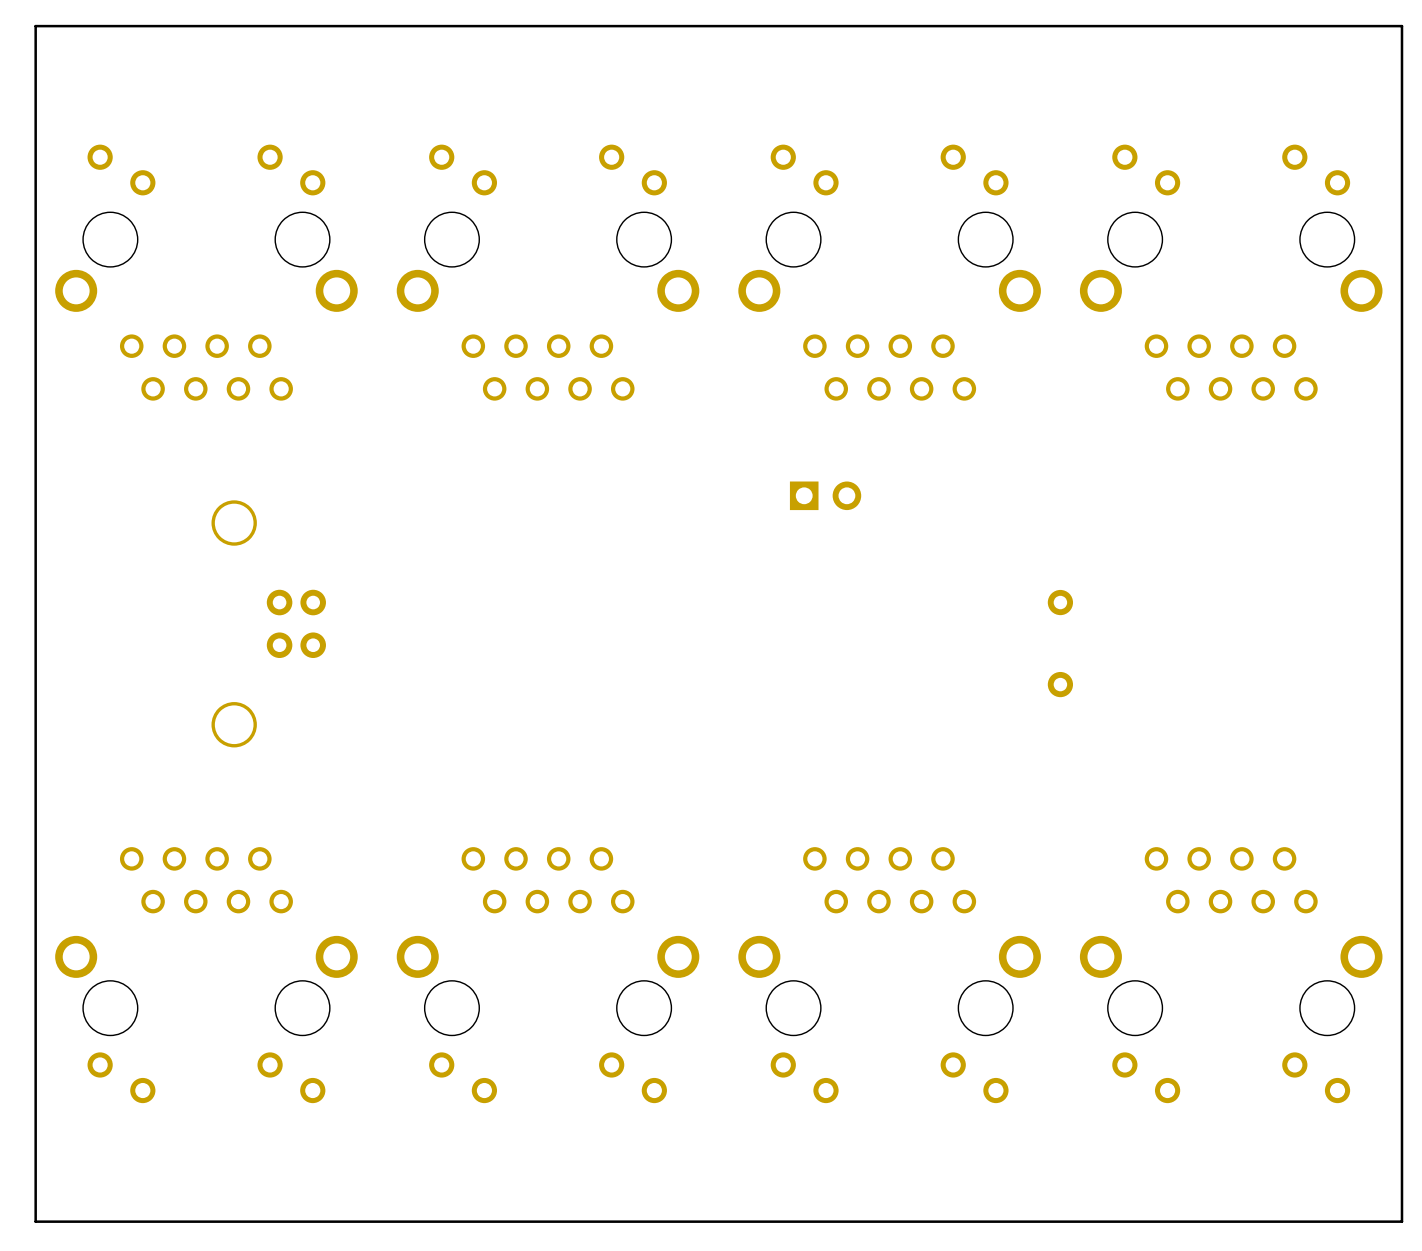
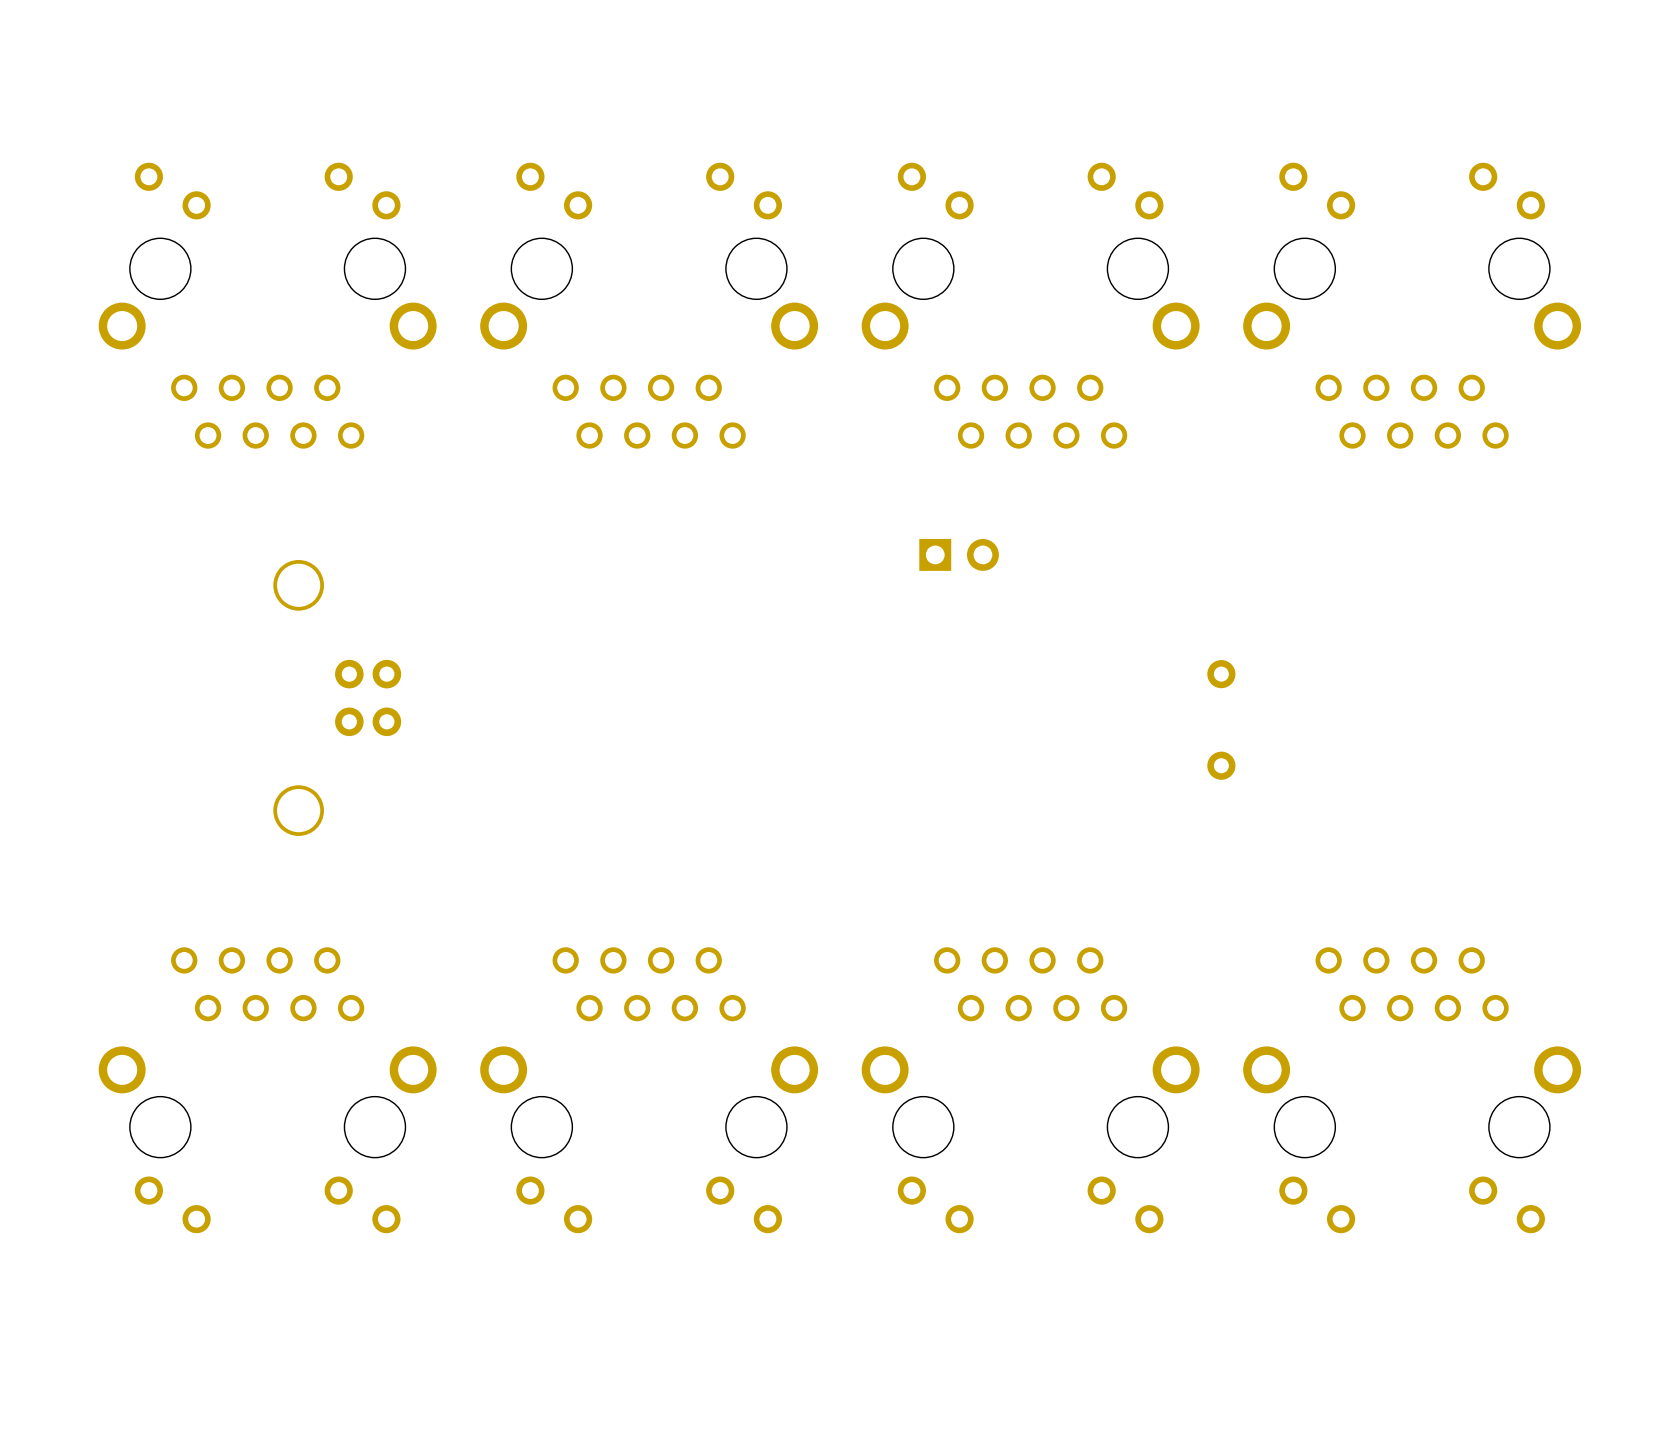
board edge: (1401, 26) (1401, 1221) (35, 1221) (35, 26) (1401, 26) -> none

